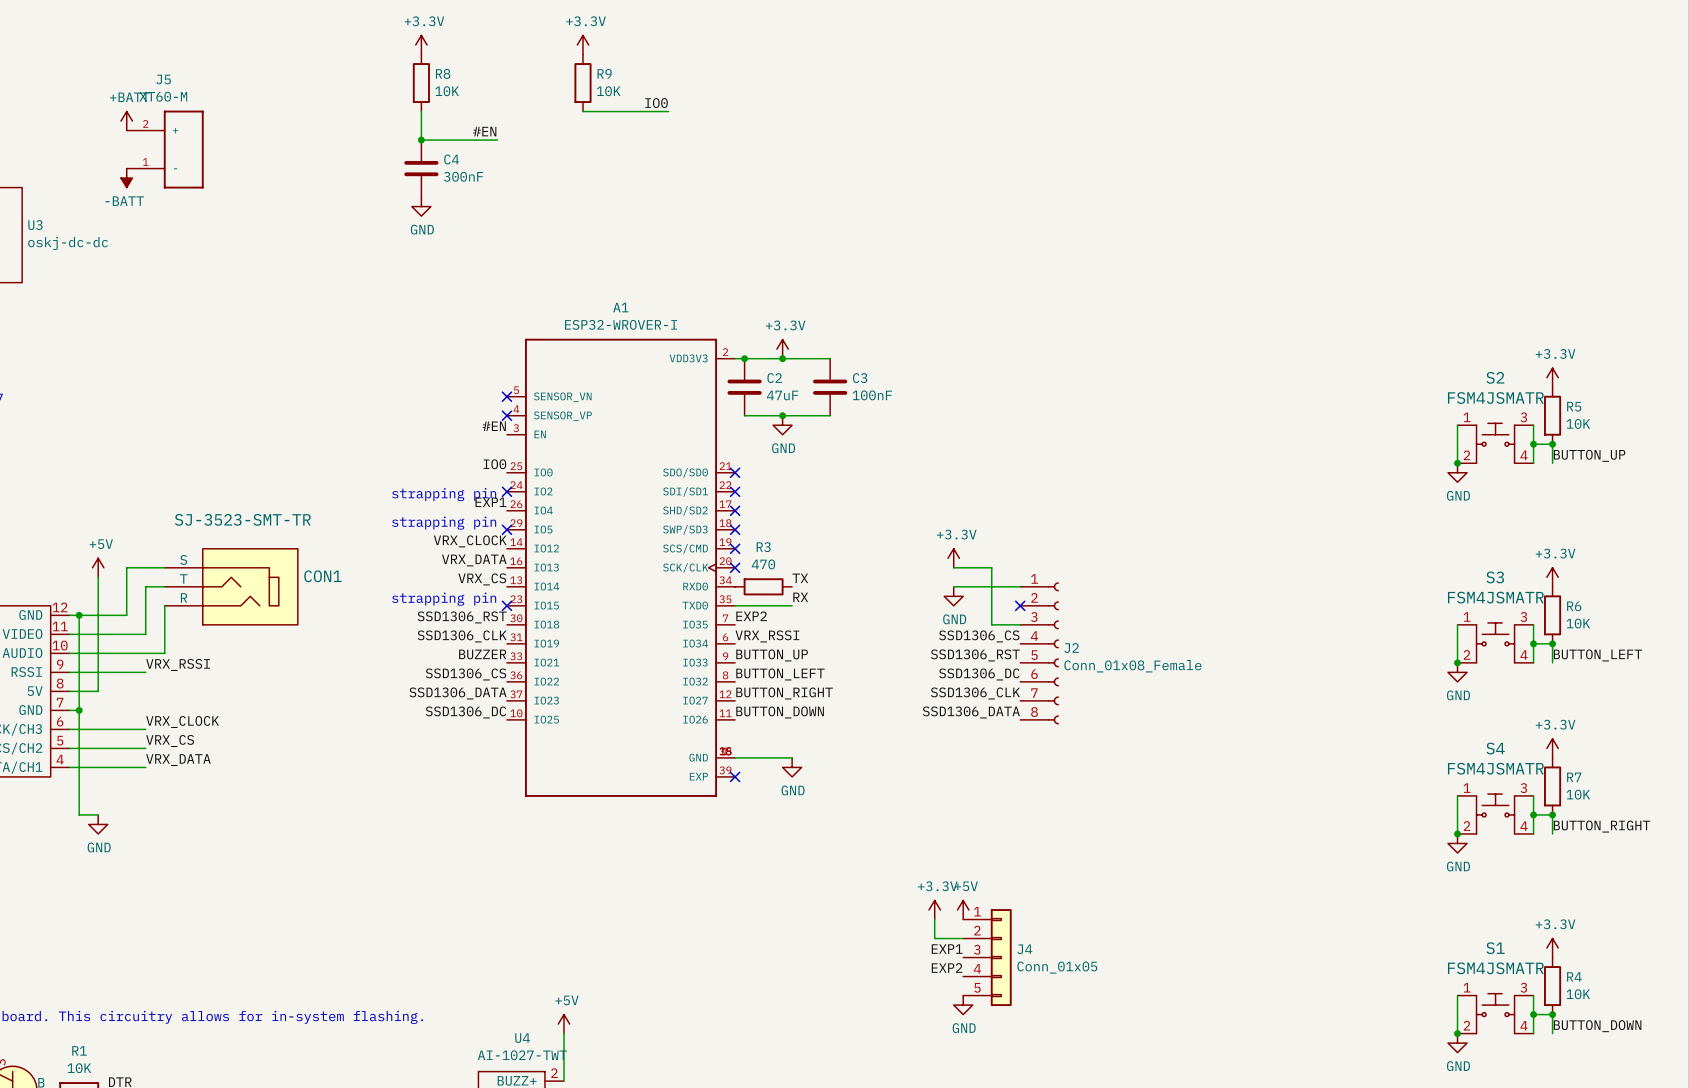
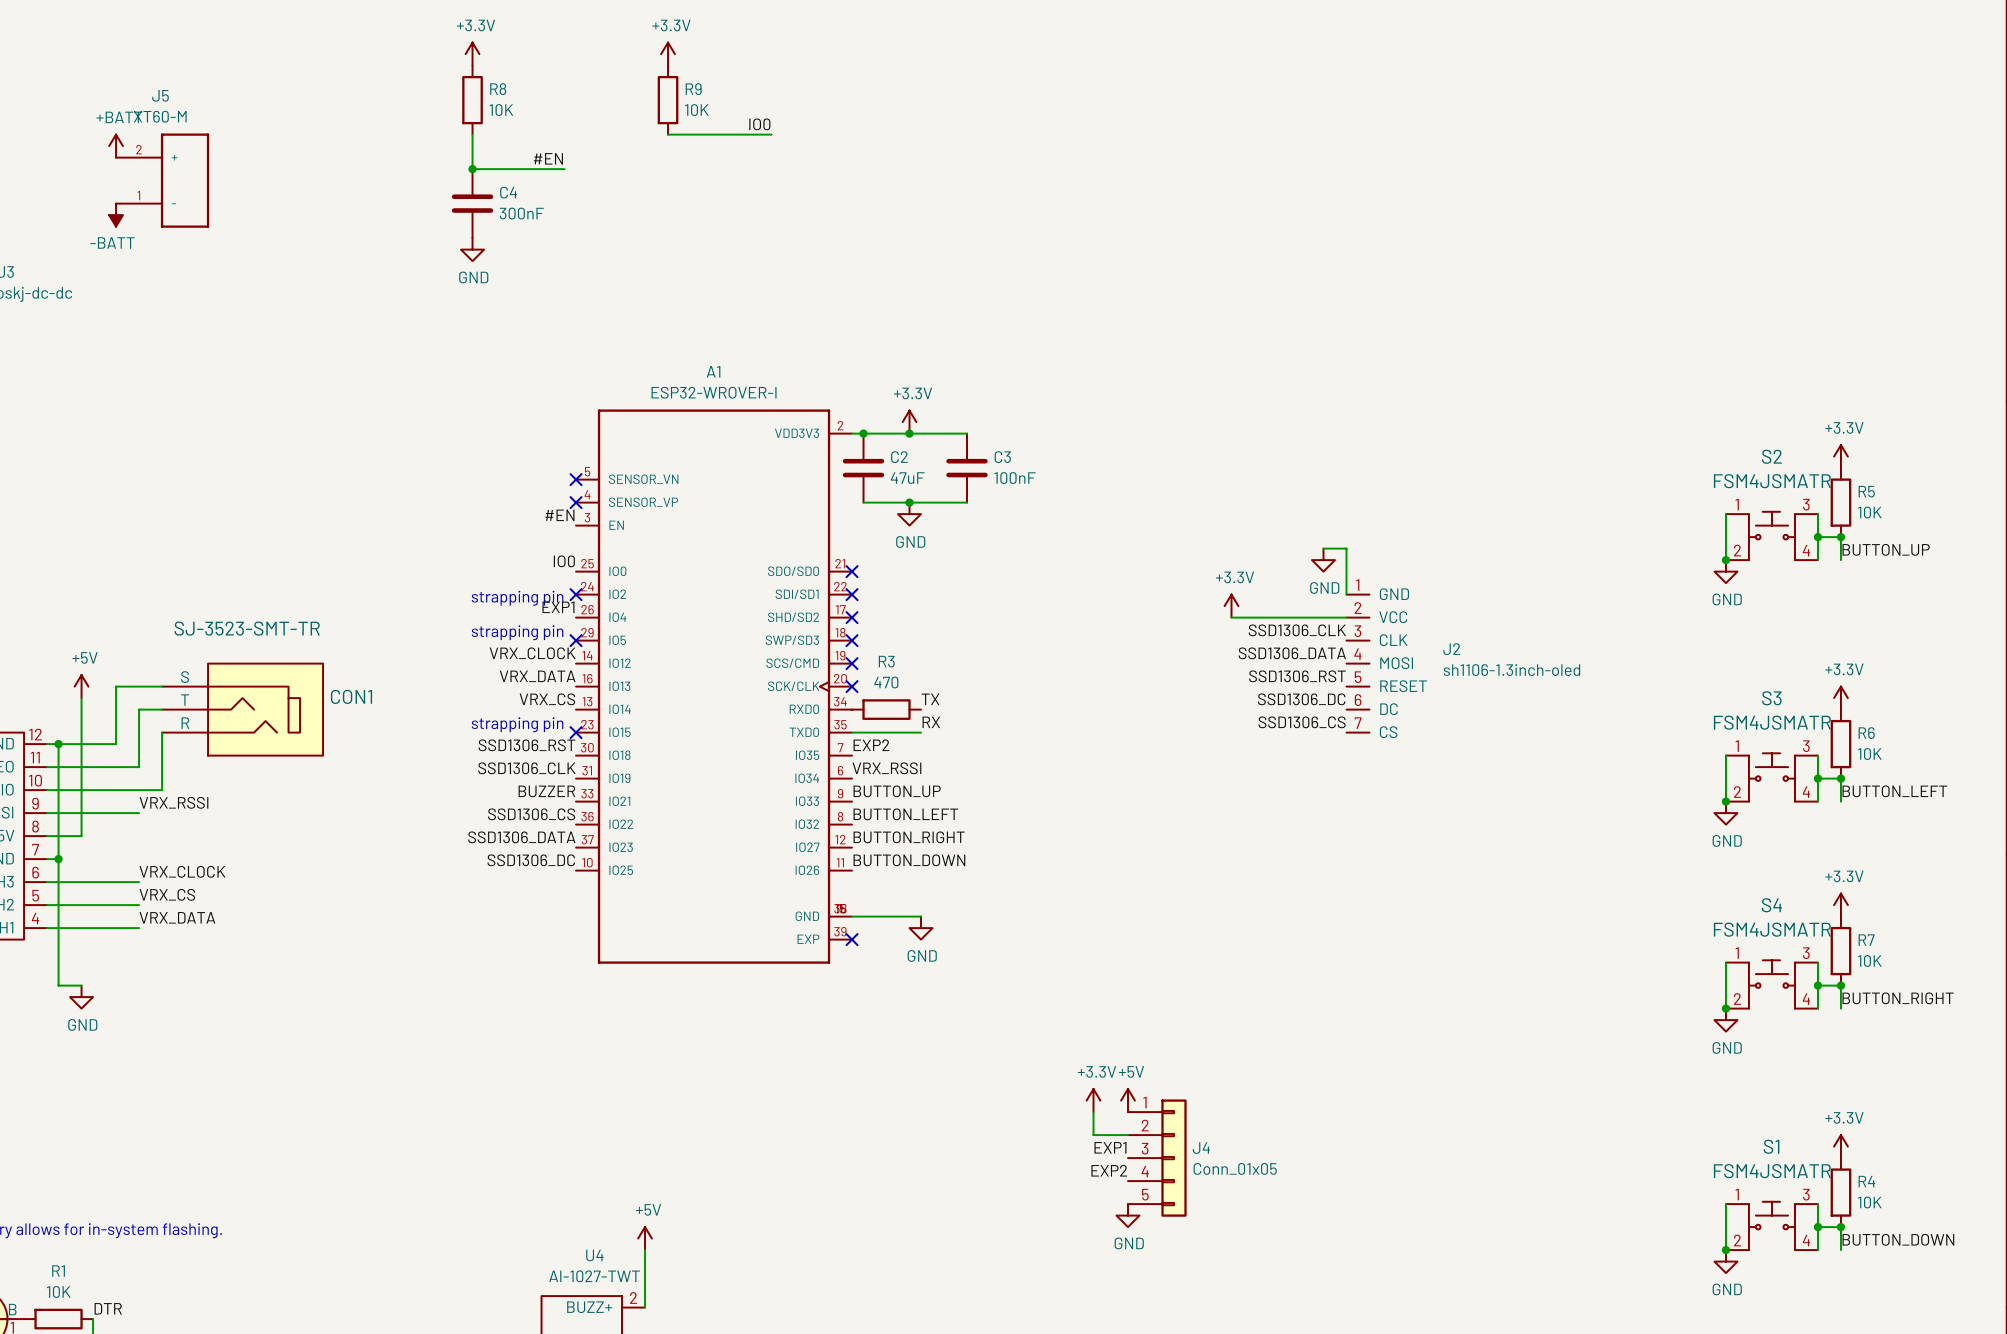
wire: none -> (1323, 548) (1346, 548) (1346, 594)
power symbol: none -> GND (1323, 560)
wire: none -> (1231, 617) (1346, 617)
label: none -> SSD1306_CLK (1297, 630)
label: none -> SSD1306_DATA (1292, 653)
power symbol position: +3.3V (953, 558) -> +3.3V (1231, 606)
wire: (953, 567) (991, 567) (991, 624) (1020, 624) -> none
J2 symbol: [1020, 582, 1059, 725] -> [1346, 594, 1370, 733]
wire: (953, 586) (1020, 586) -> none
power symbol: GND (953, 596) -> none
no-connect mark: (1020, 605) -> none
label position: SSD1306_CS (979, 636) -> SSD1306_CS (1302, 722)
J2 name position: J2 (1071, 648) -> J2 (1451, 649)
label position: SSD1306_RST (975, 655) -> SSD1306_RST (1297, 676)
J2 value: Conn_01x08_Female (1132, 666) -> sh1106-1.3inch-oled (1511, 670)
label position: SSD1306_DC (979, 674) -> SSD1306_DC (1301, 699)
label: SSD1306_CLK (975, 693) -> none
label: SSD1306_DATA (971, 712) -> none

